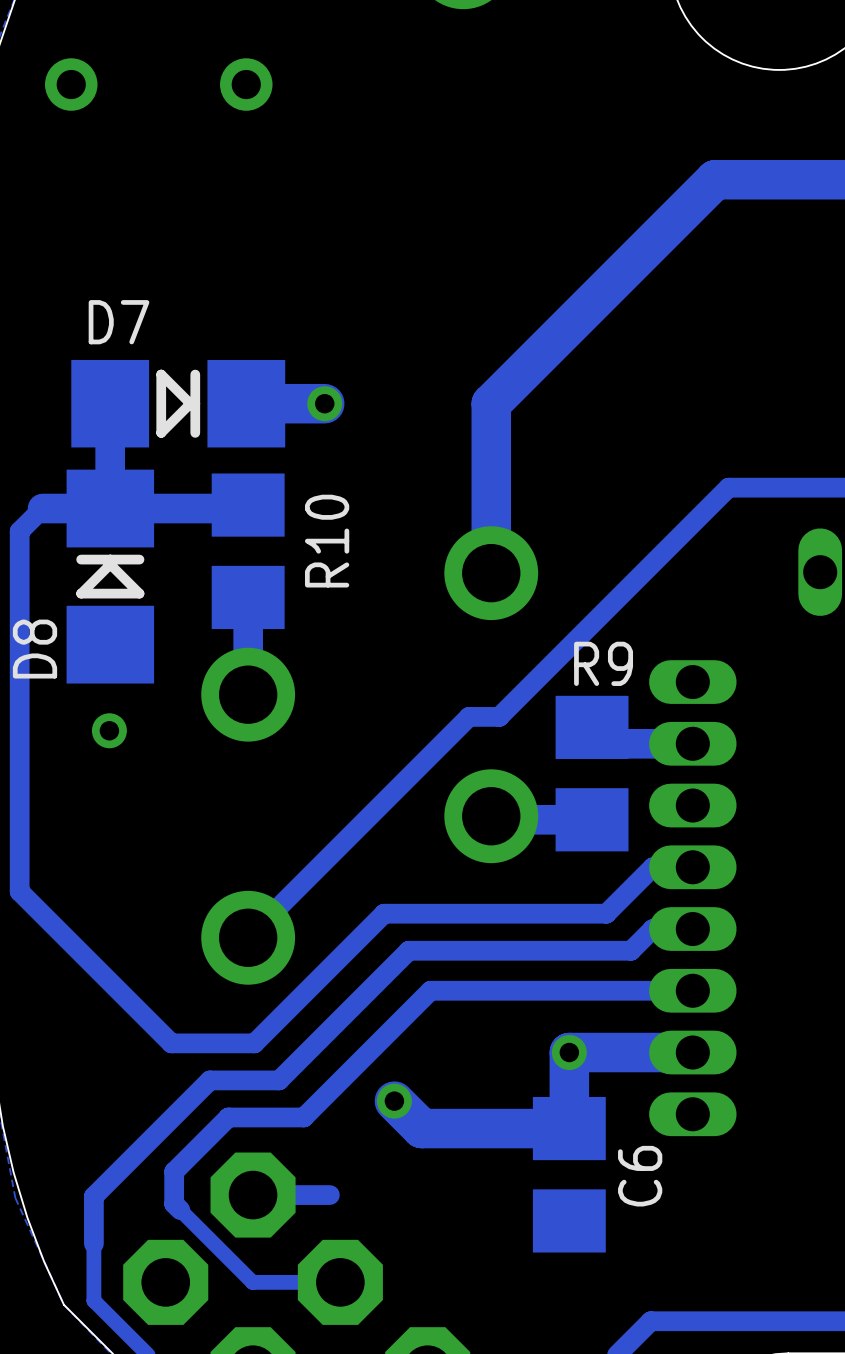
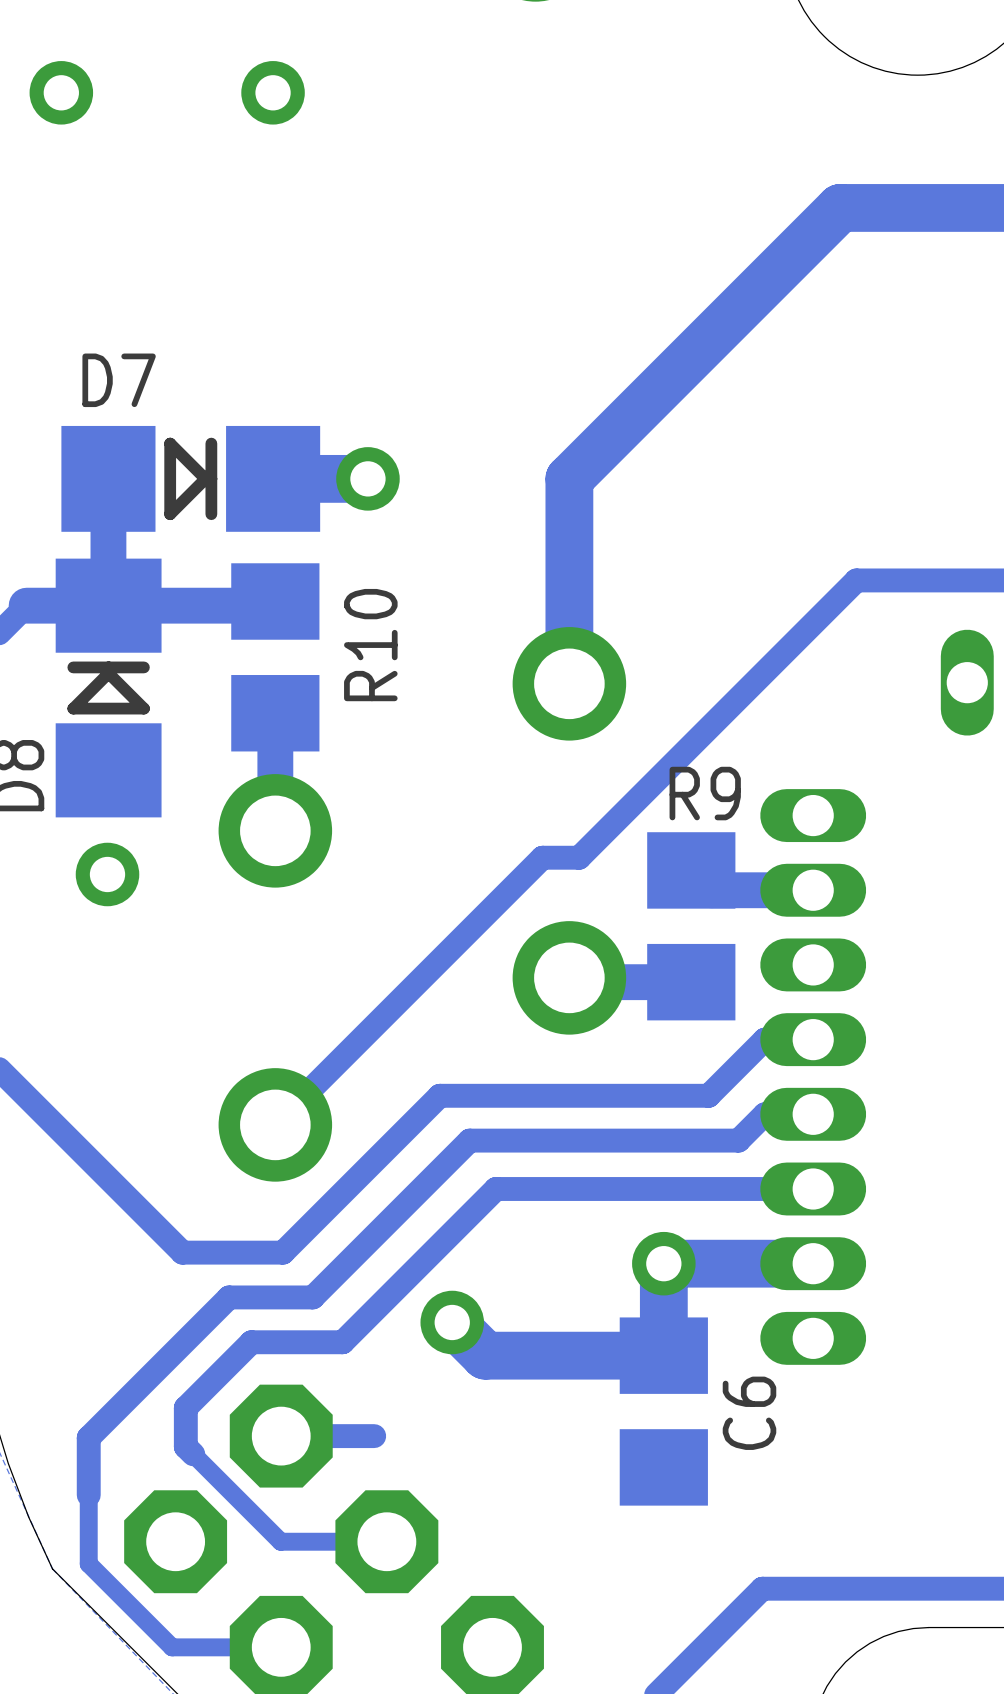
via size: [307, 386, 343, 422] -> [336, 447, 400, 511]
via size: [91, 713, 127, 749] -> [75, 842, 140, 907]
via size: [551, 1035, 587, 1071] -> [632, 1231, 696, 1296]
via size: [376, 1083, 412, 1119] -> [420, 1290, 484, 1355]

